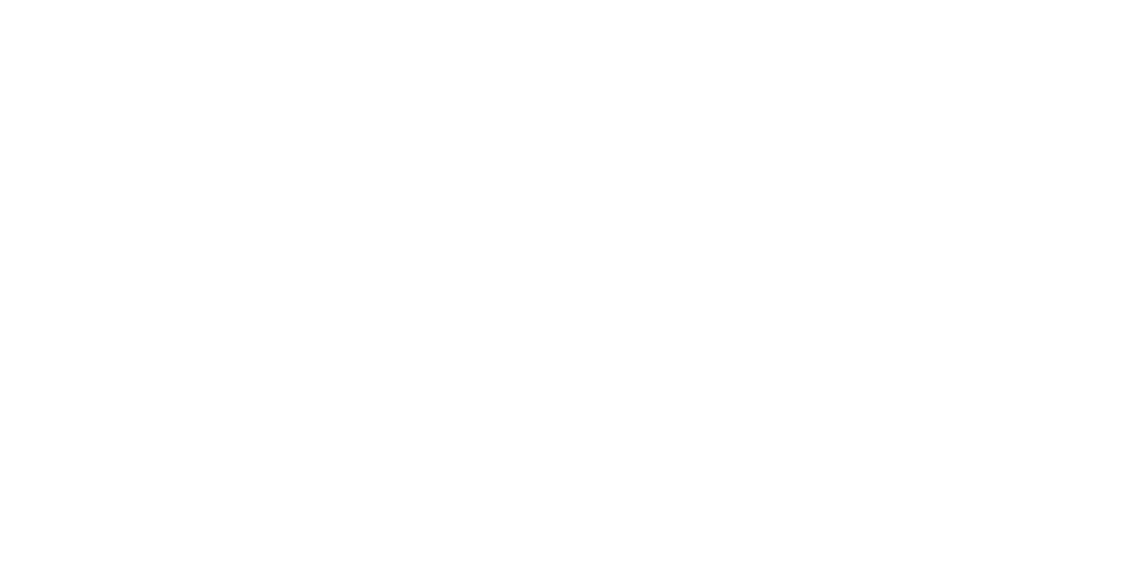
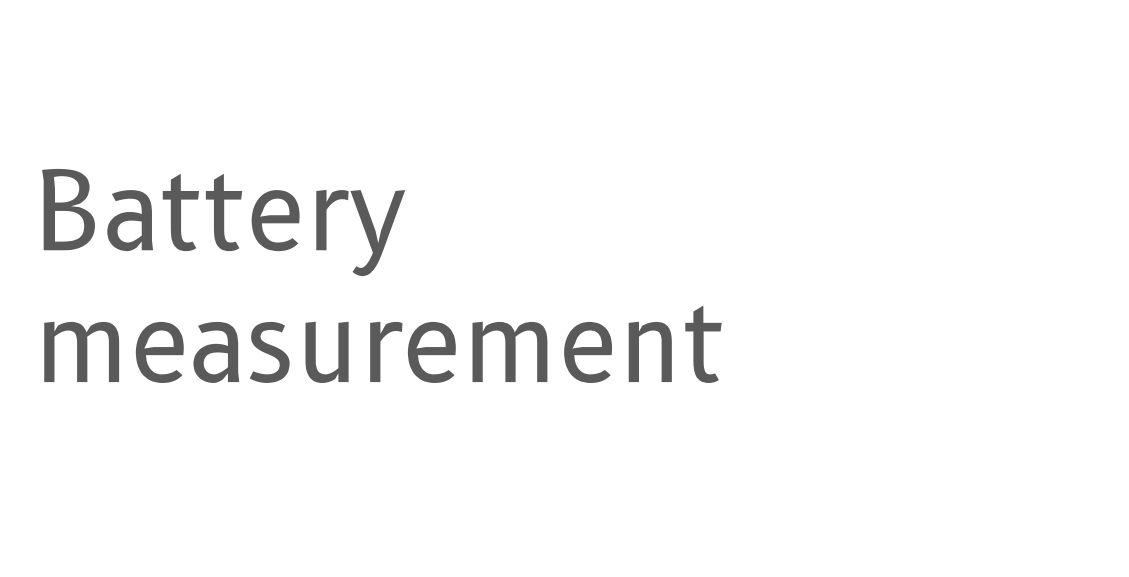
text: none -> Battery (223, 222)
text: none -> measurement (382, 344)

